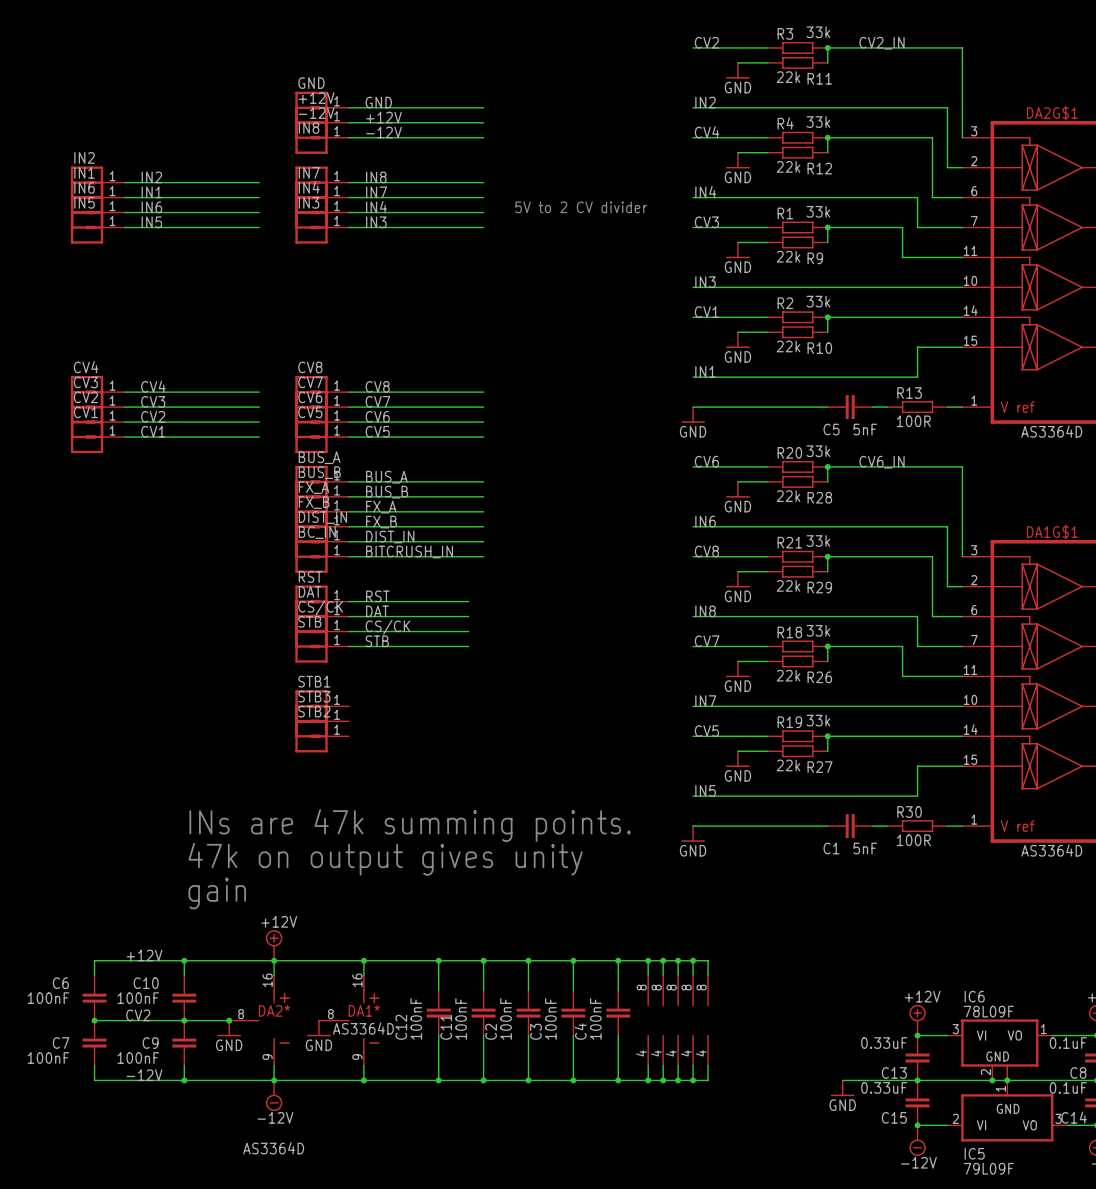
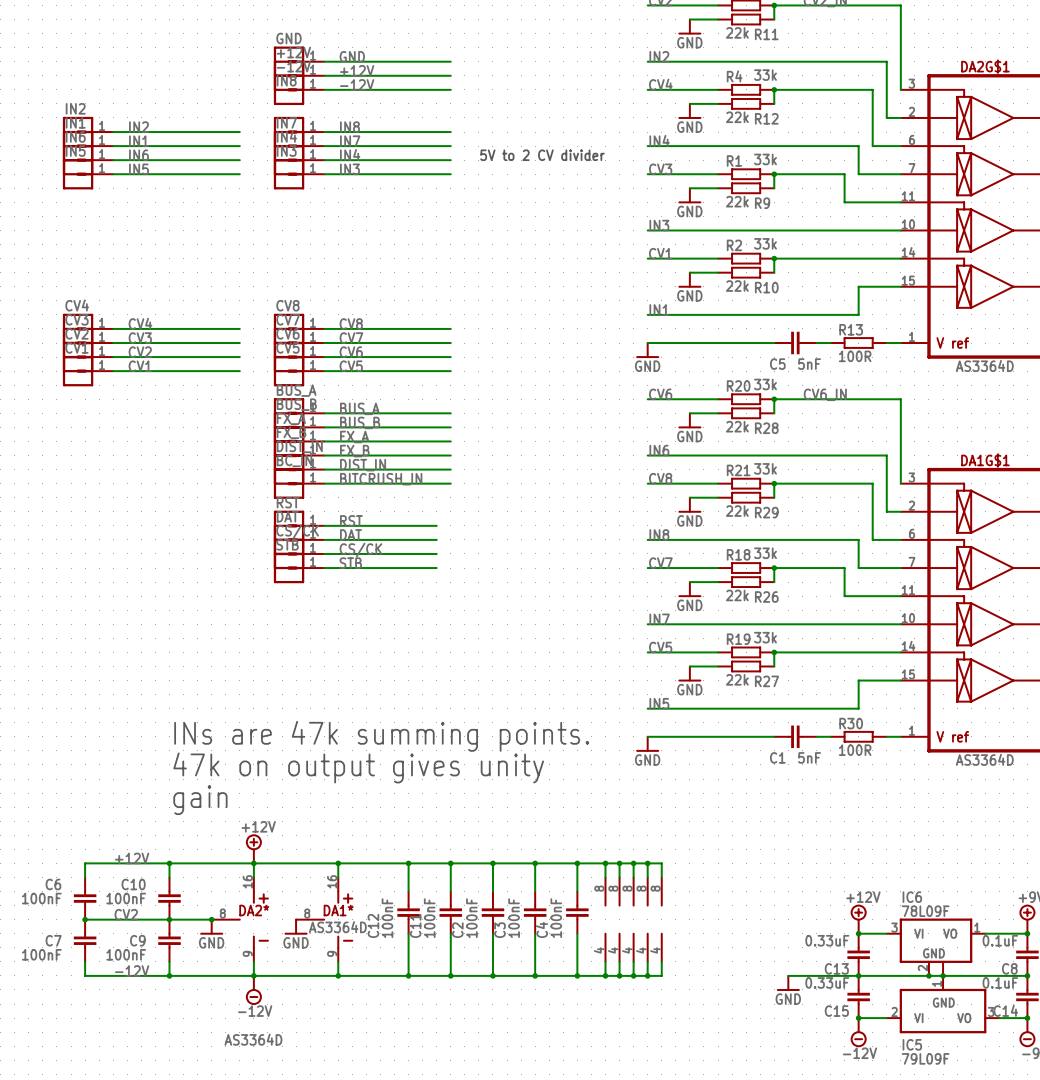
STB1: (322, 706) -> none
STB3: (322, 721) -> none
STB2: (322, 736) -> none

